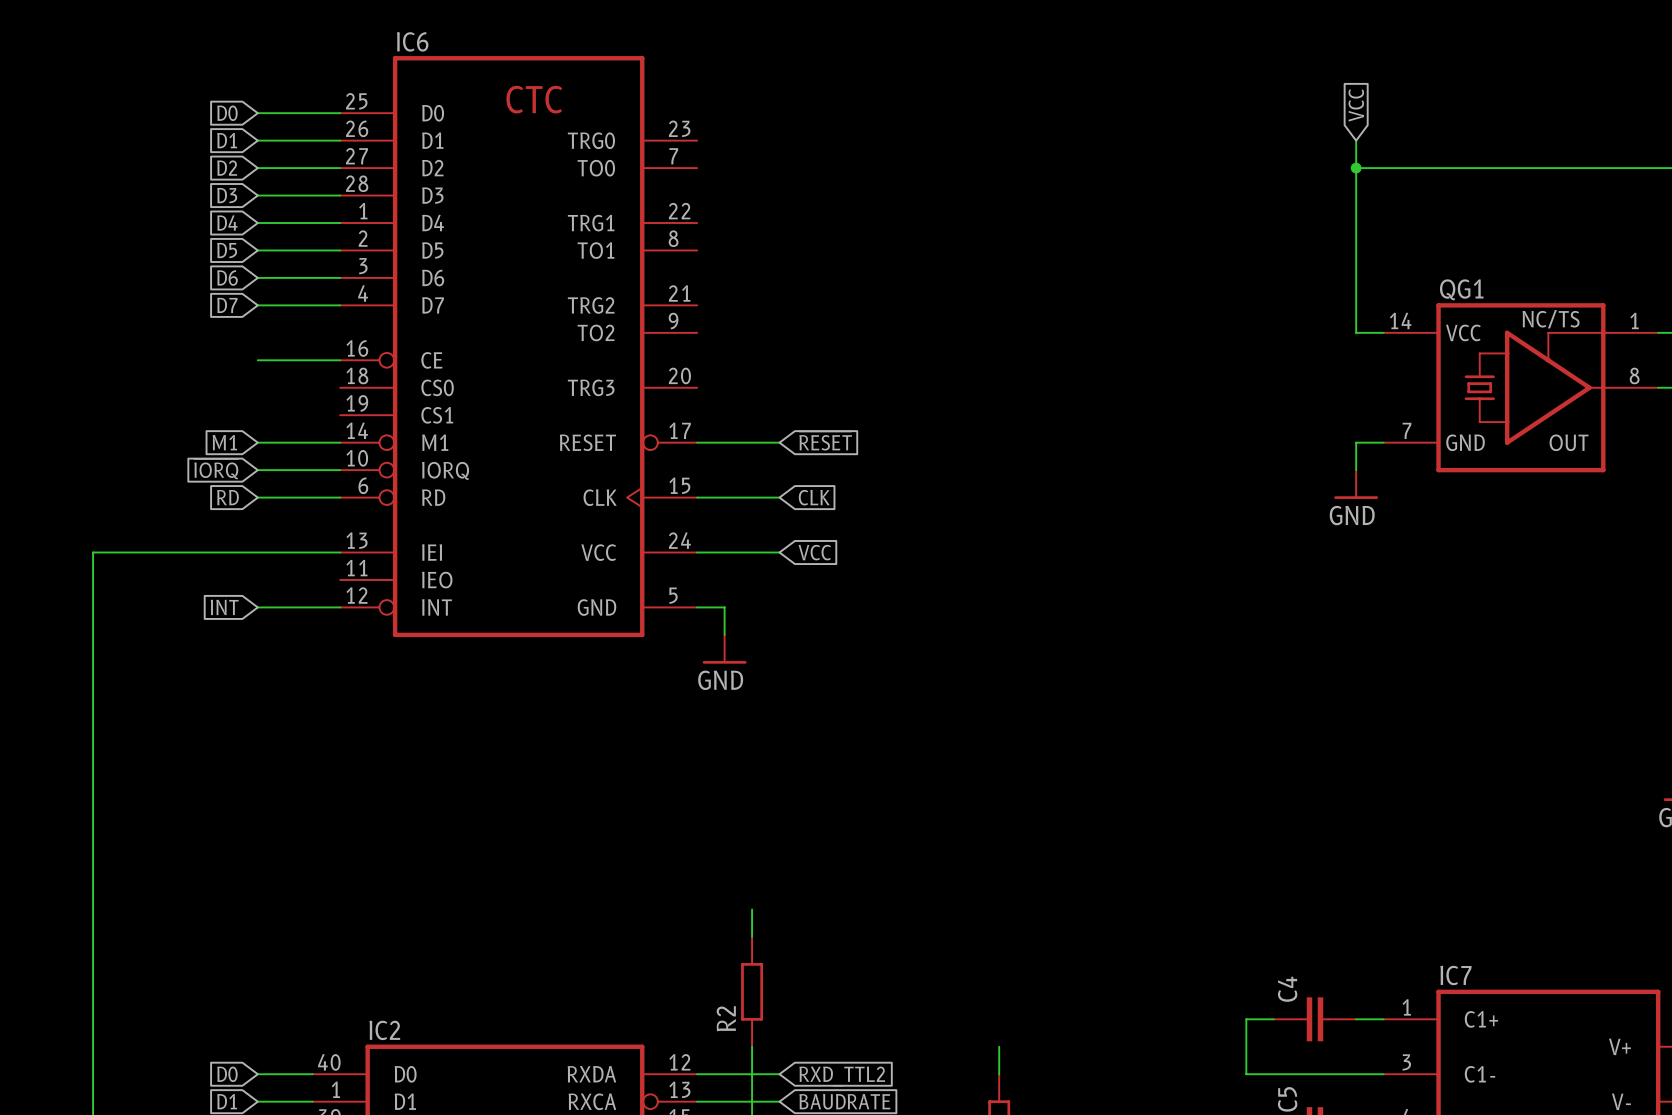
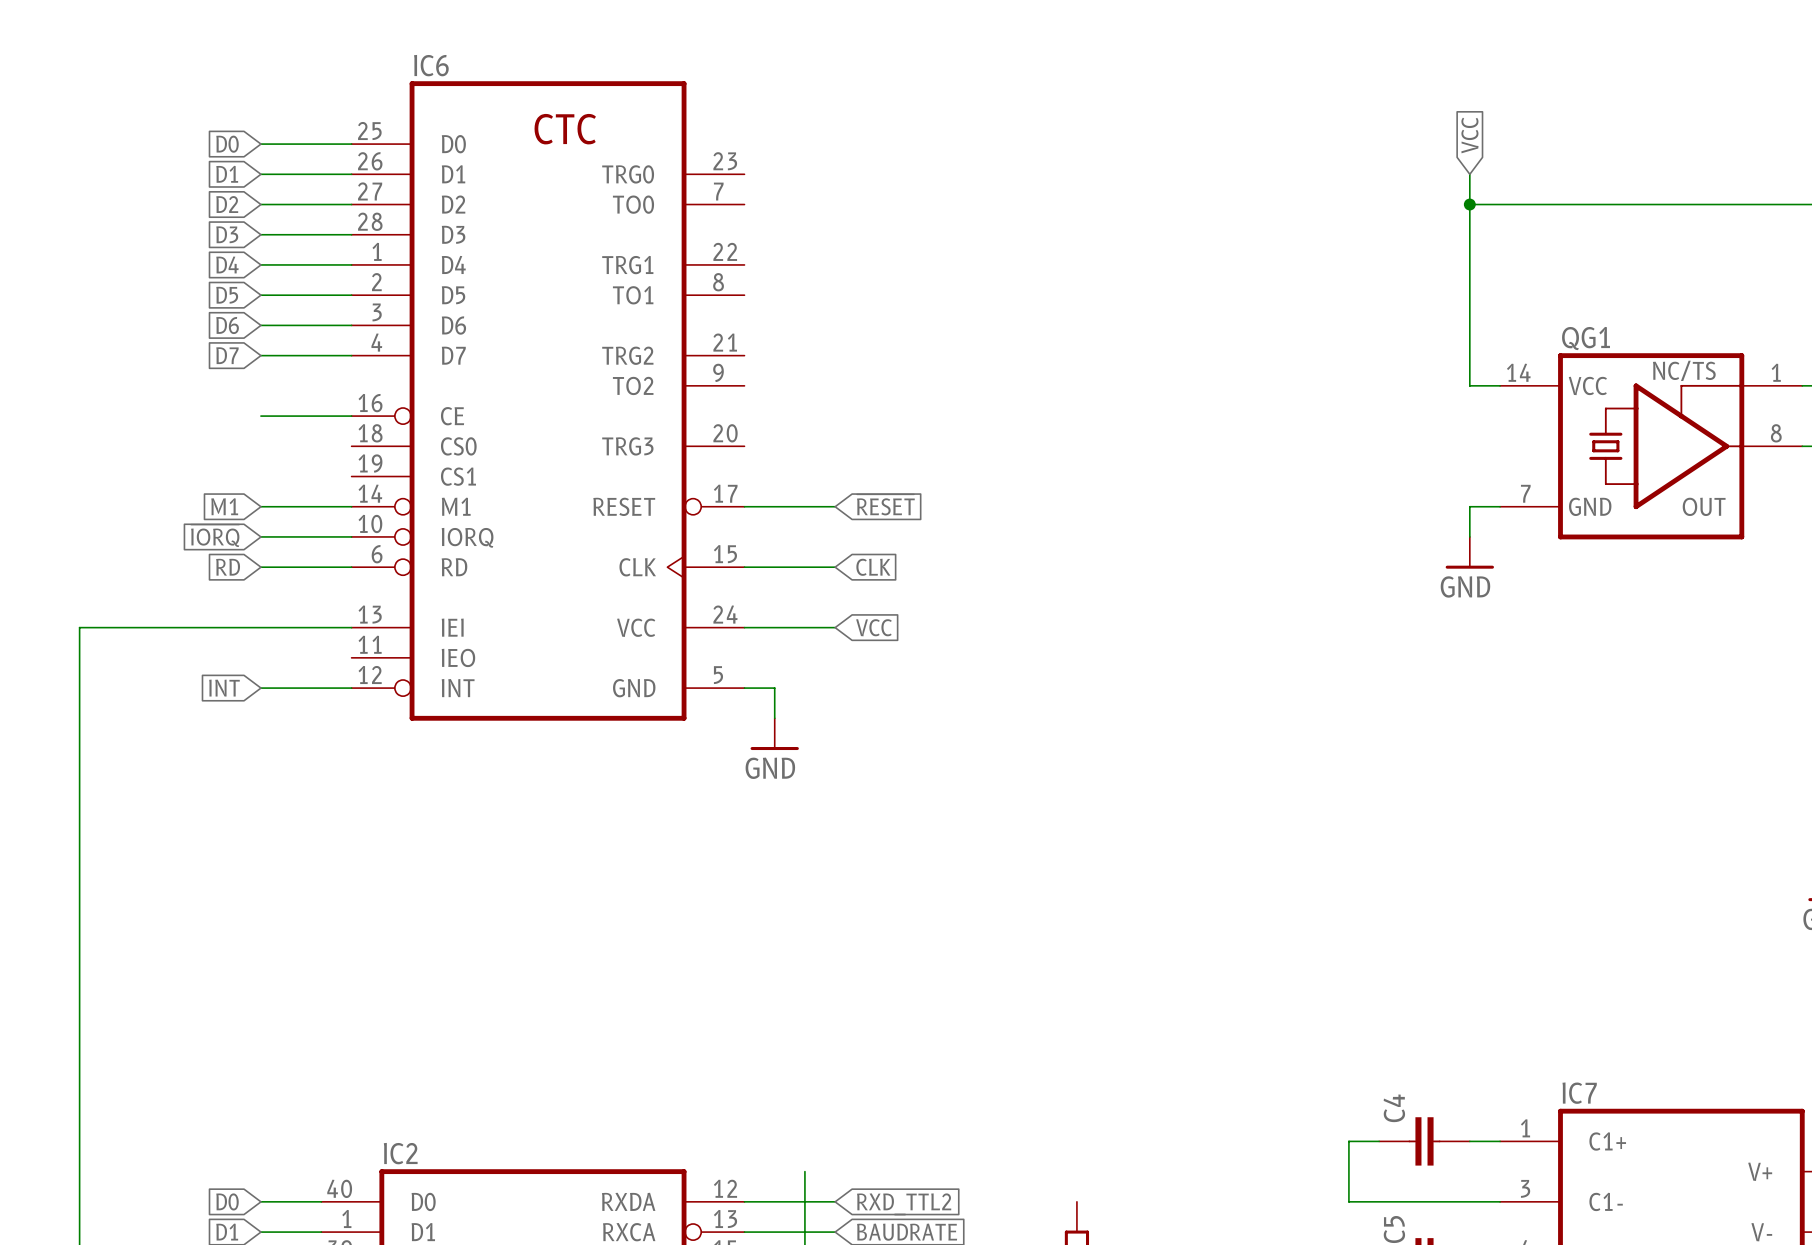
wire: (752, 909) (752, 936) -> none
R2: (752, 991) -> none
wire: (999, 1046) (999, 1074) -> none

